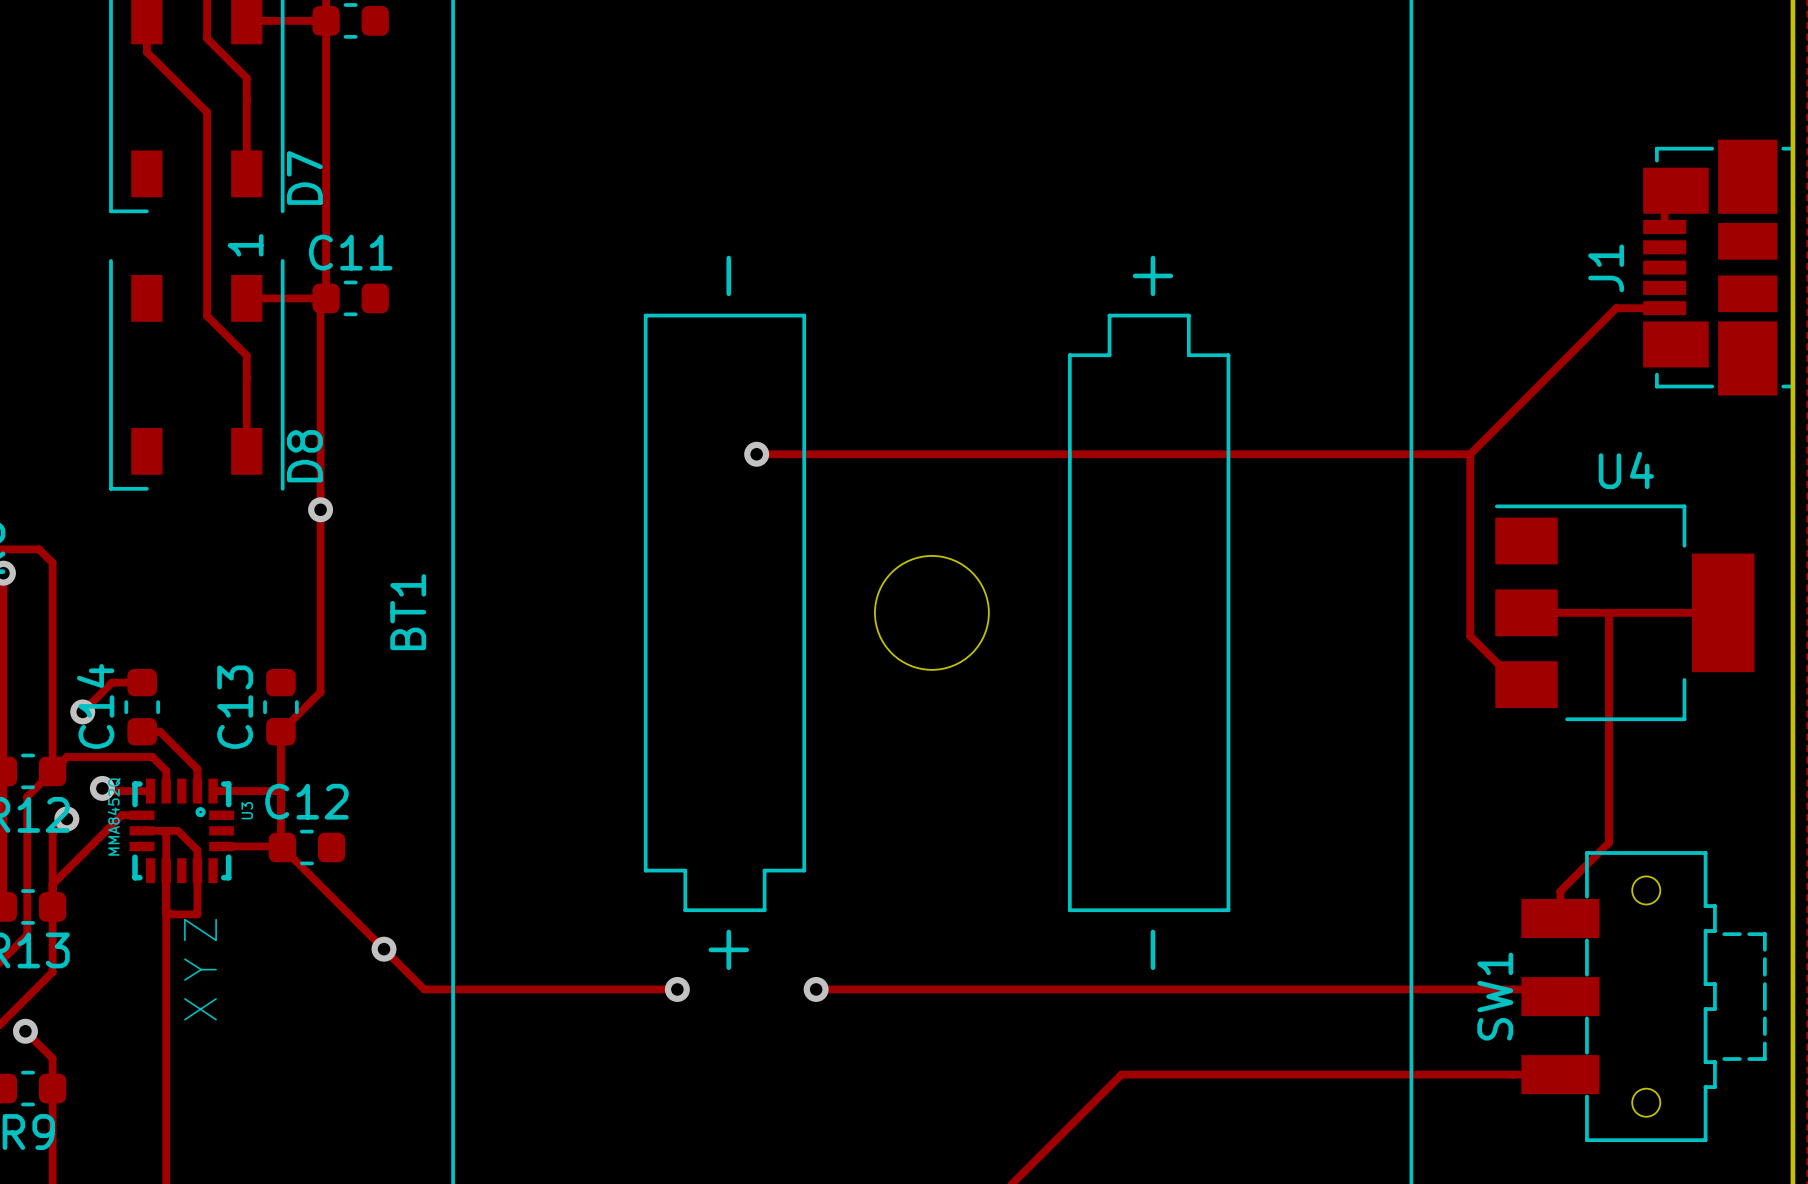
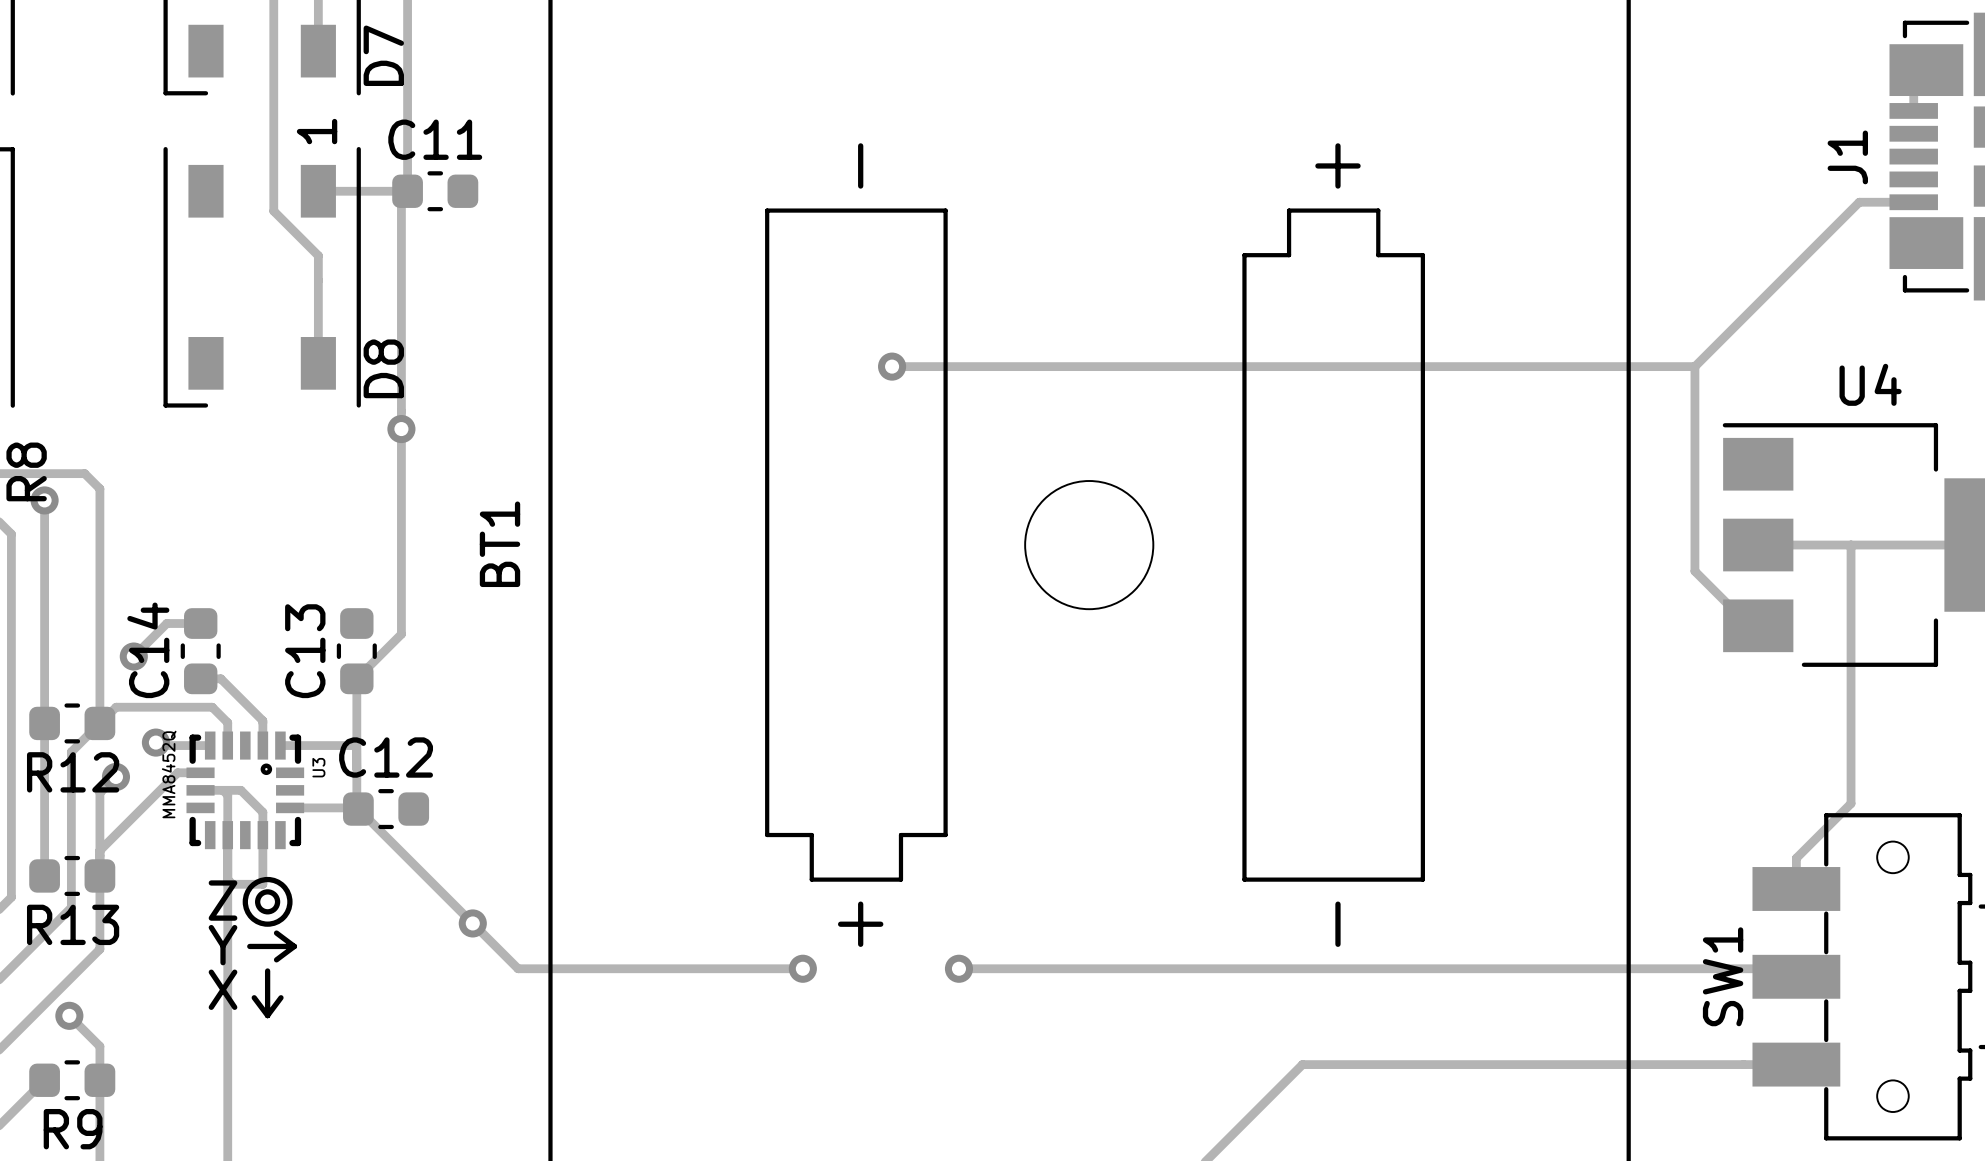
drawing: none -> [242, 876, 293, 927]
U3 text rotation: 0° (200, 929) -> 90° clockwise (223, 900)
line: none -> (276, 933) (294, 946)
line: none -> (249, 946) (294, 946)
U3 text rotation: 0° (200, 969) -> 90° clockwise (223, 945)
line: none -> (294, 946) (276, 959)
line: none -> (267, 970) (267, 1015)
U3 text rotation: 0° (200, 1009) -> 90° clockwise (223, 989)
line: none -> (254, 997) (267, 1015)
line: none -> (280, 997) (267, 1015)

